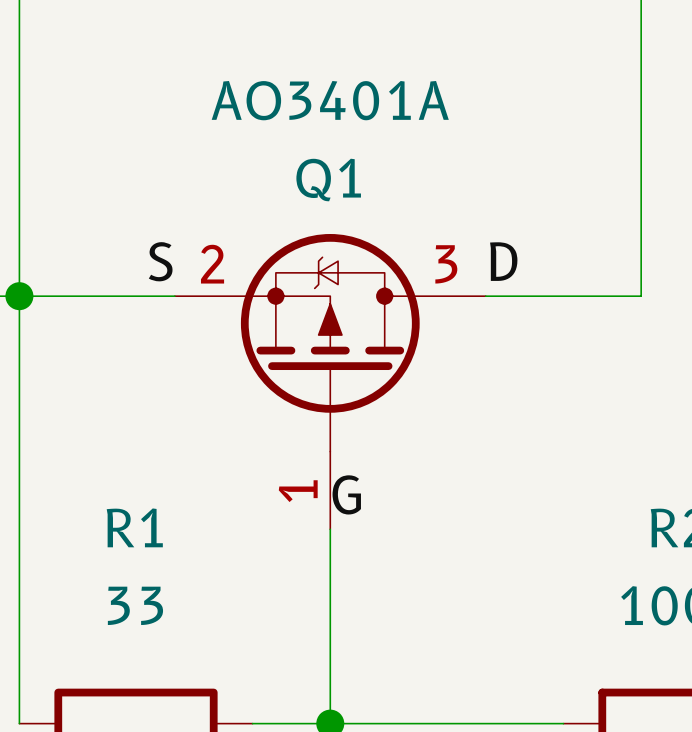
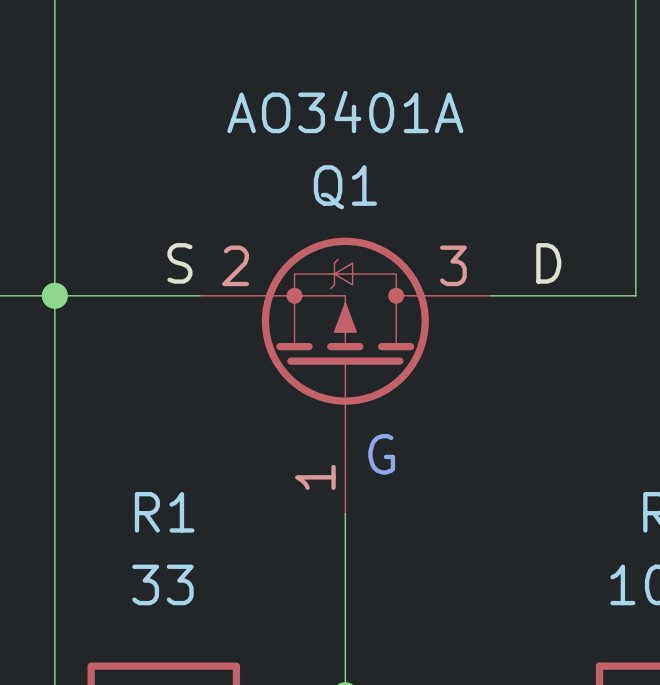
label position: D (503, 261) -> D (548, 263)
text: none -> G (381, 454)
label: G (346, 494) -> none

